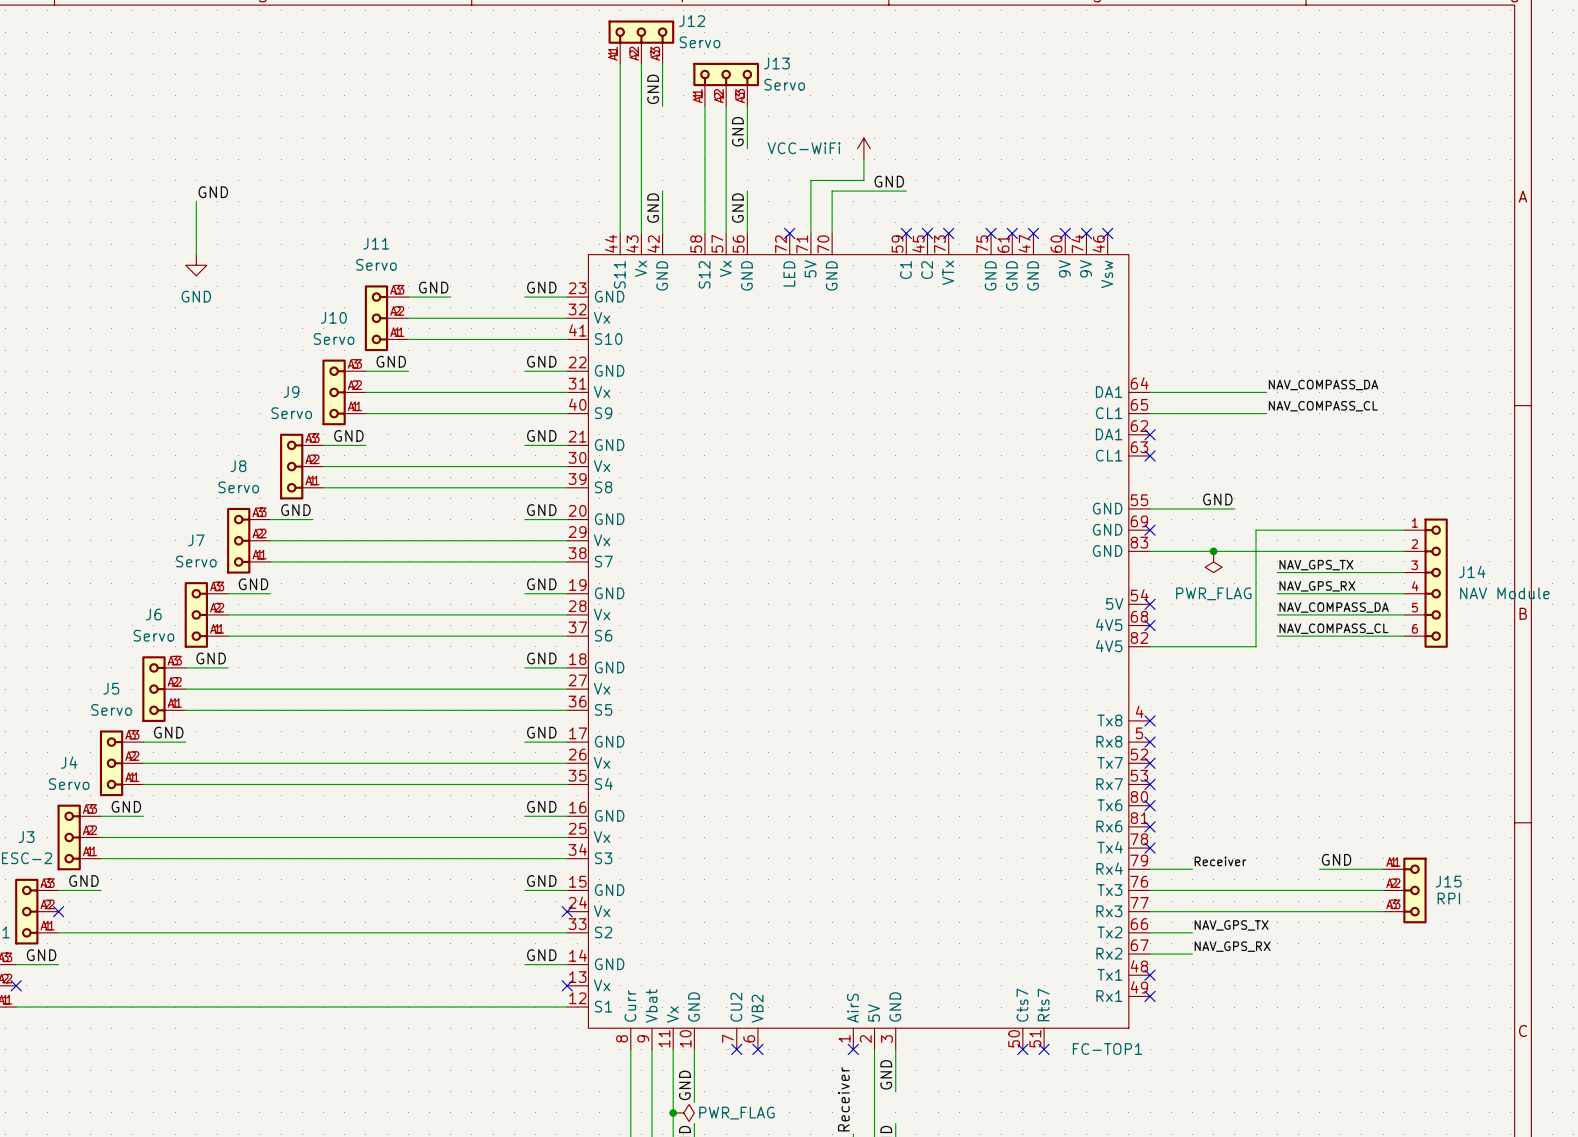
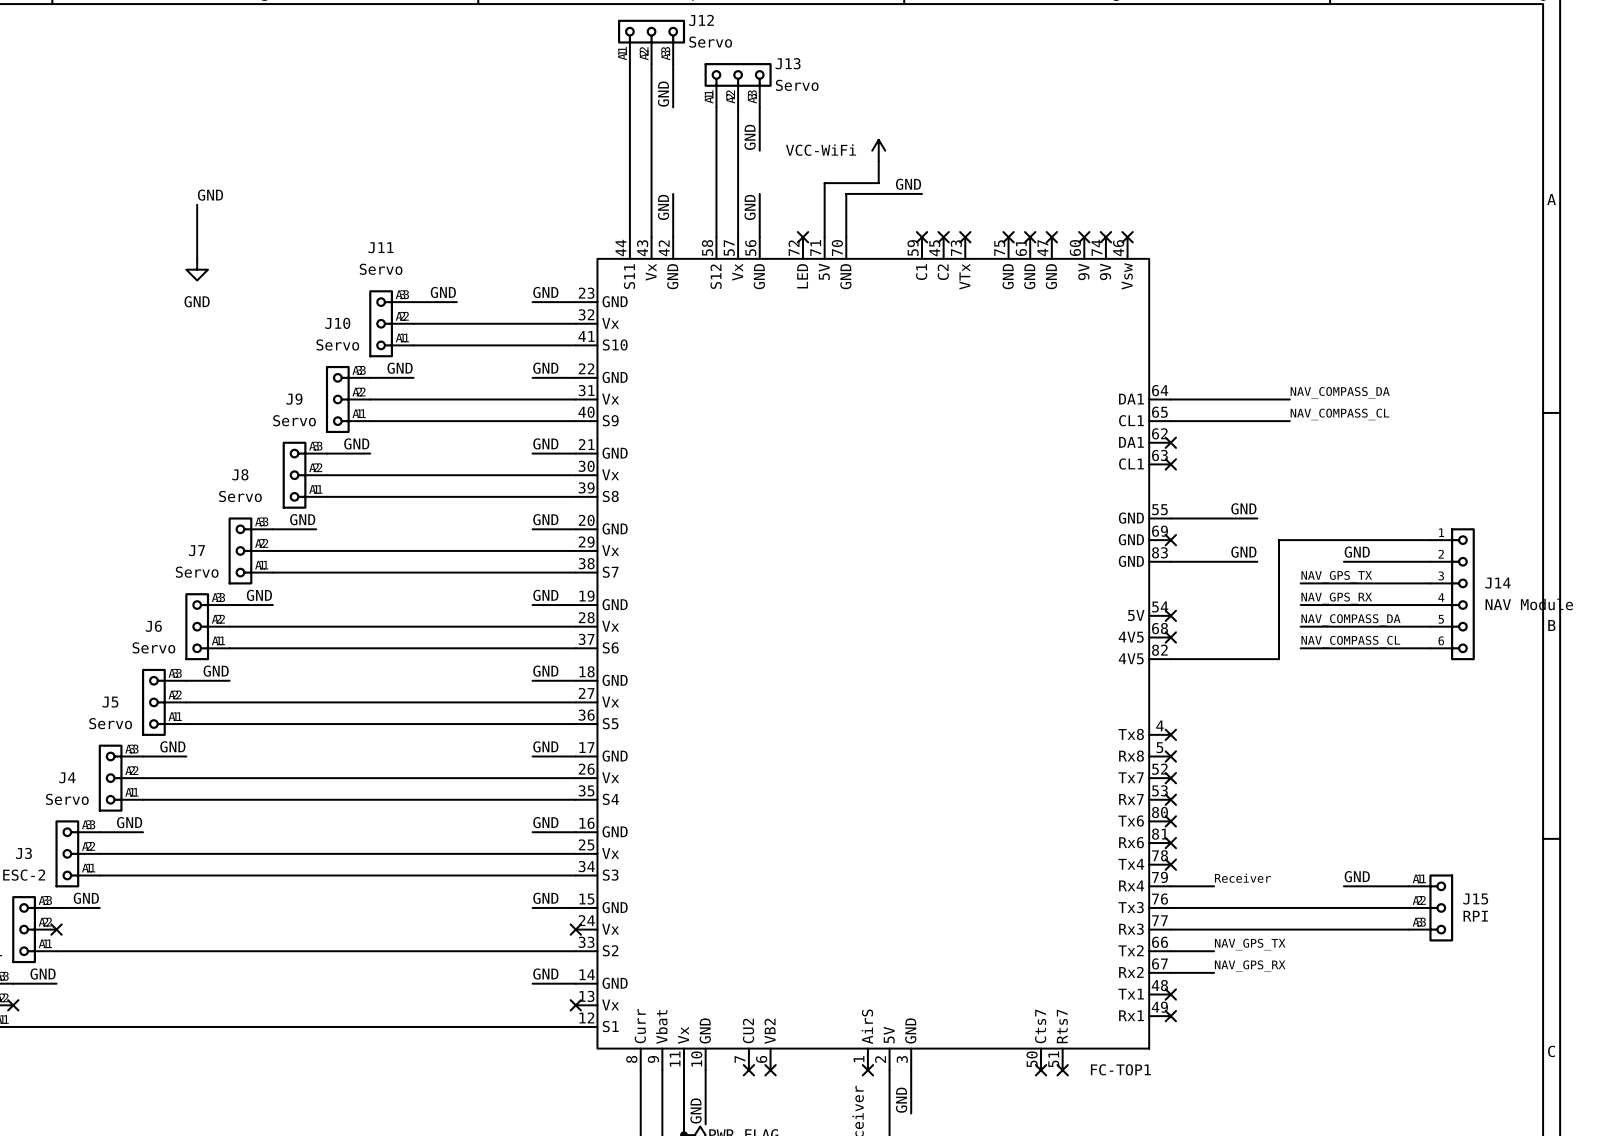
label: none -> GND (1243, 552)
label: none -> GND (1357, 552)
junction: (1213, 551) -> none
wire: (1234, 551) (1319, 551) -> none
power symbol: PWR_FLAG (1213, 561) -> none

